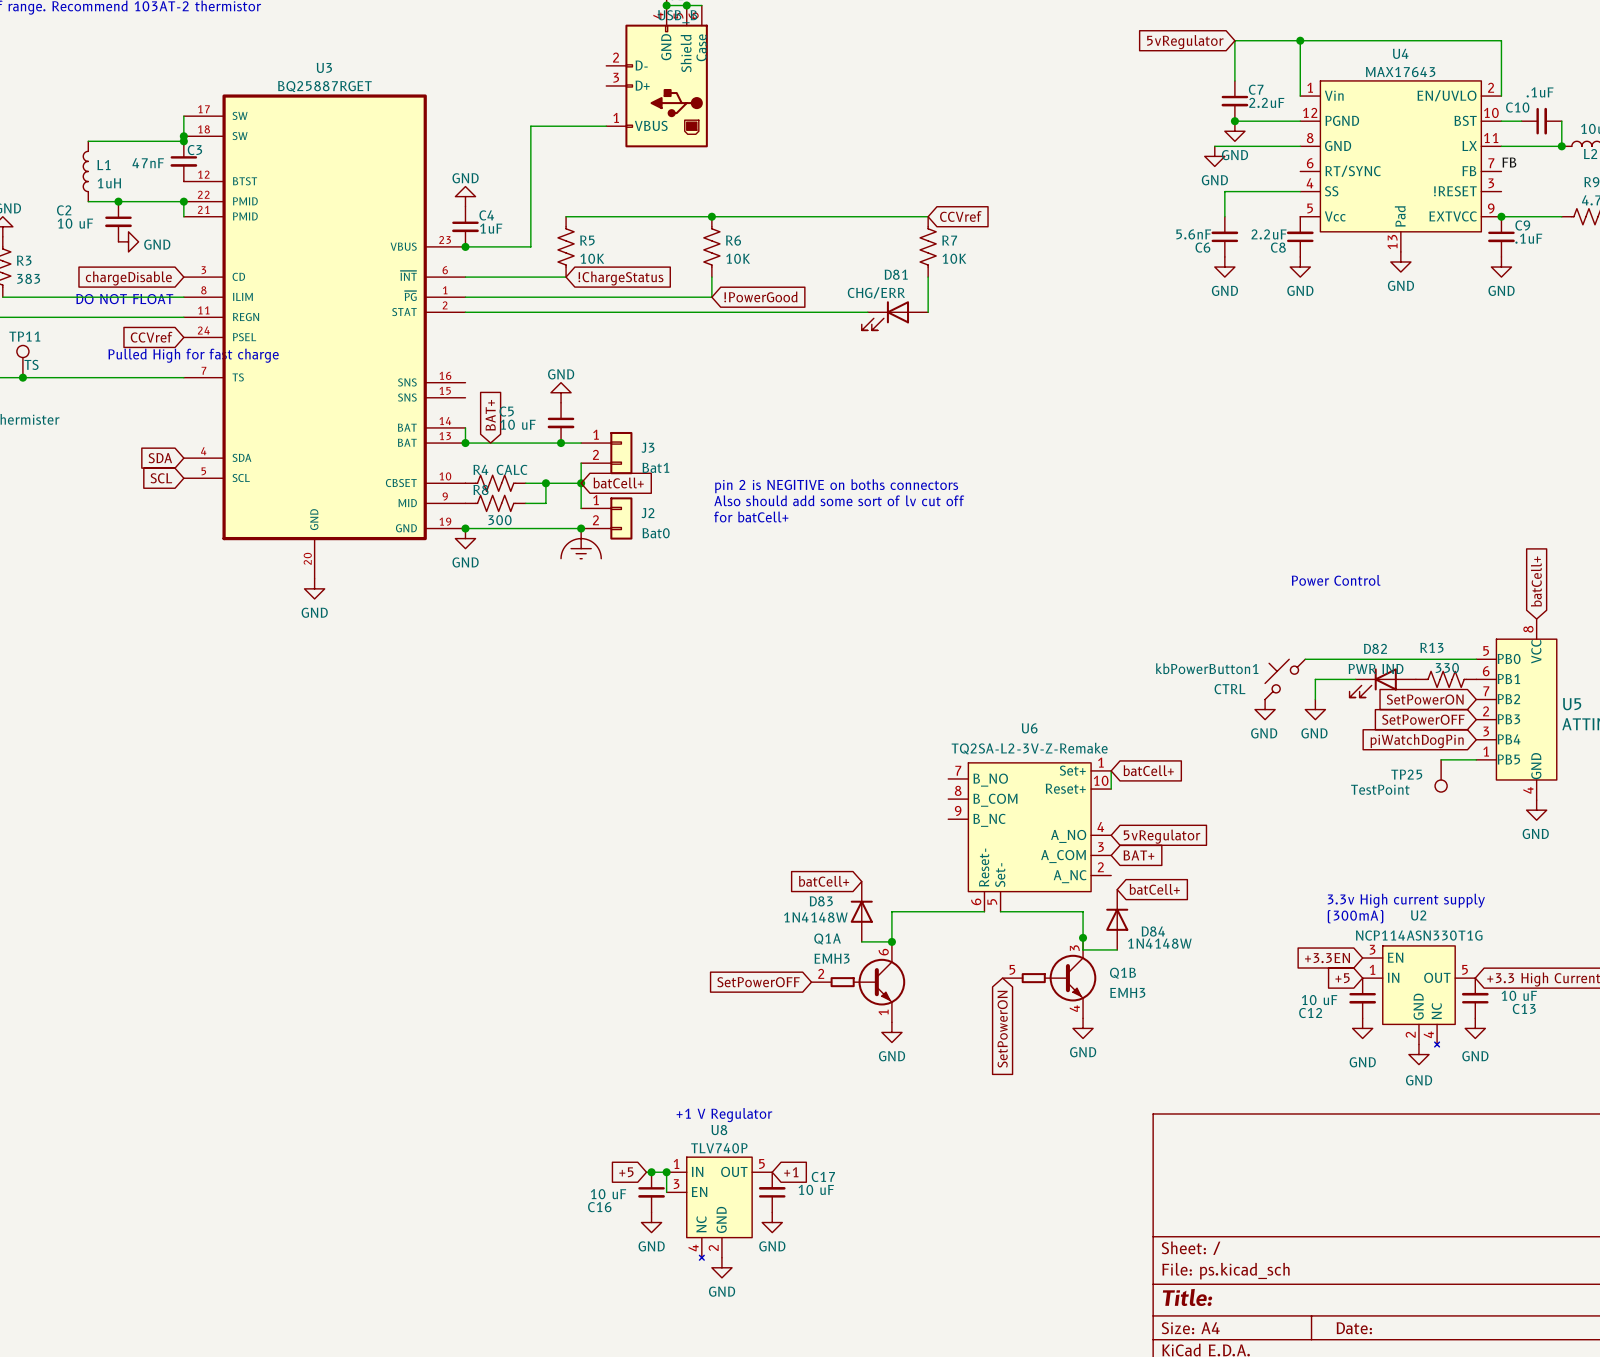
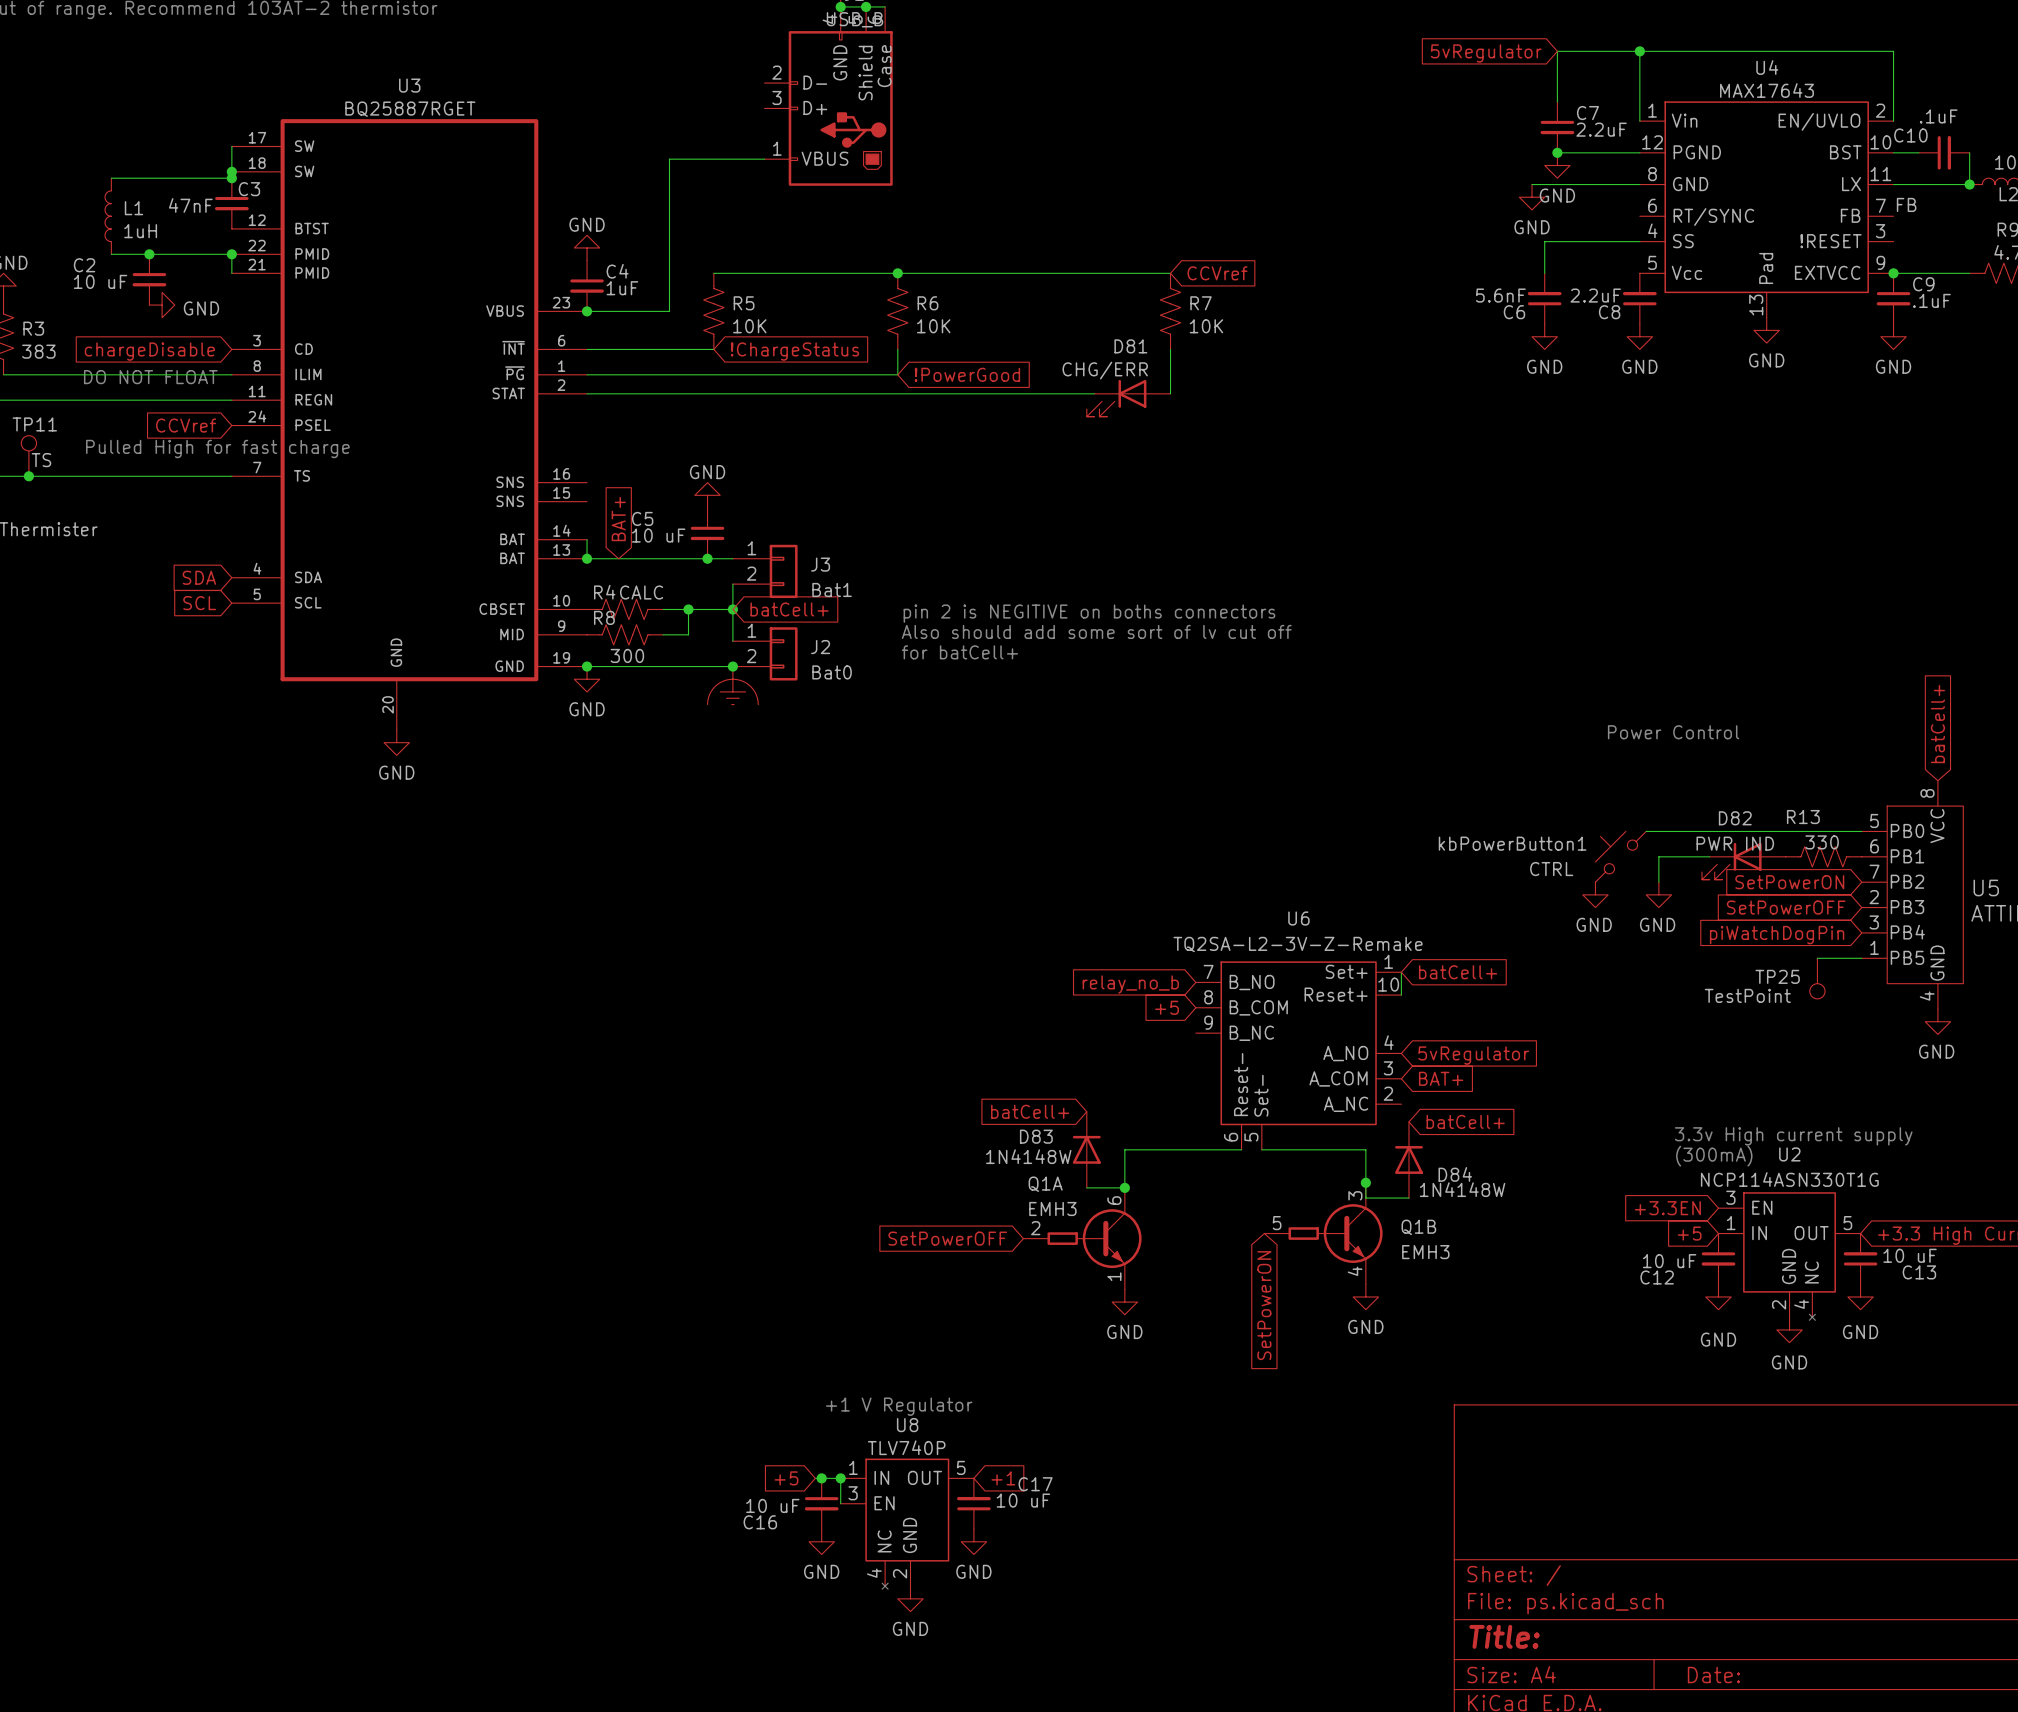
global label: none -> relay_no_b (1130, 984)
global label: none -> +5 (1167, 1007)

